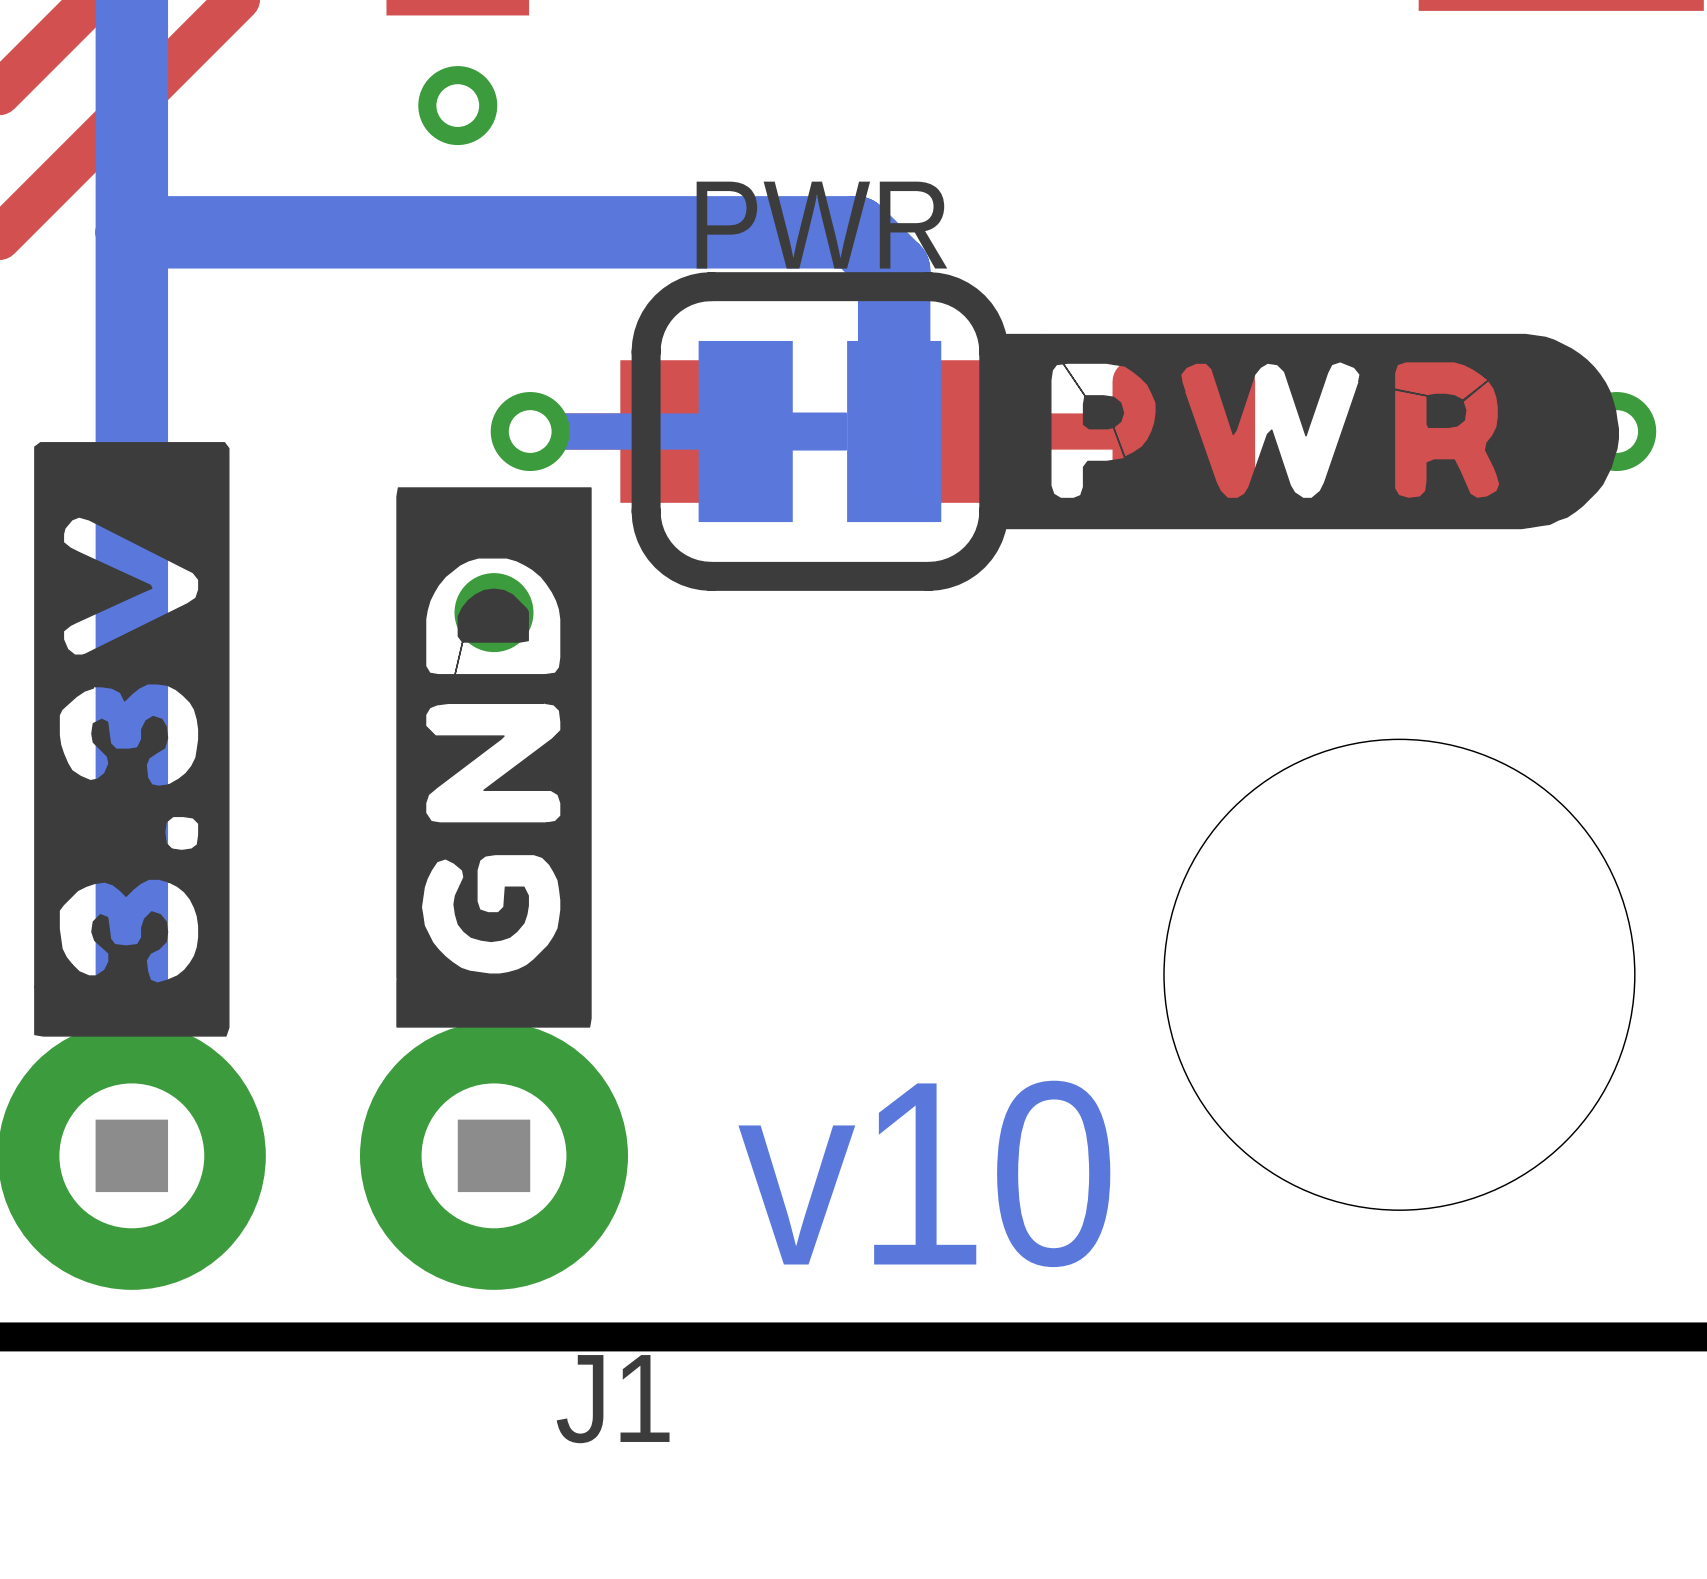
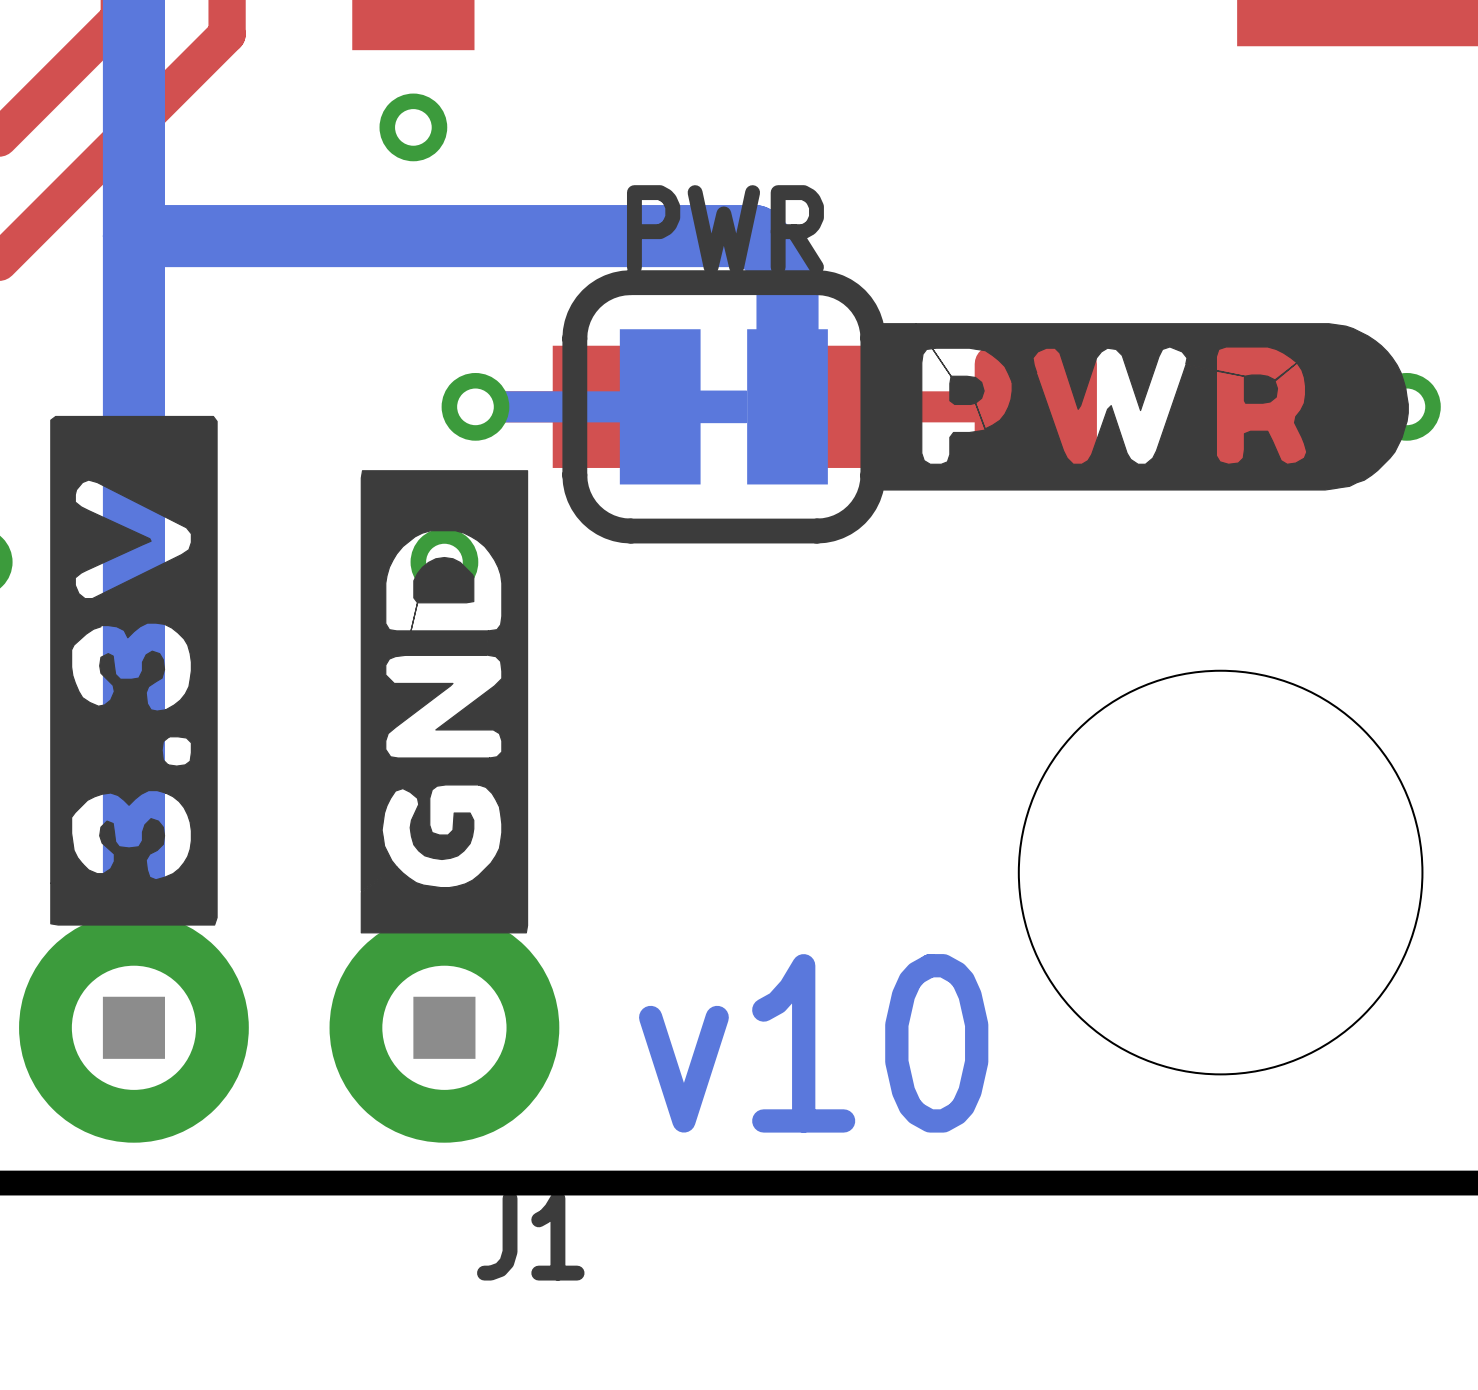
drawing position: (494, 757) -> (444, 701)

